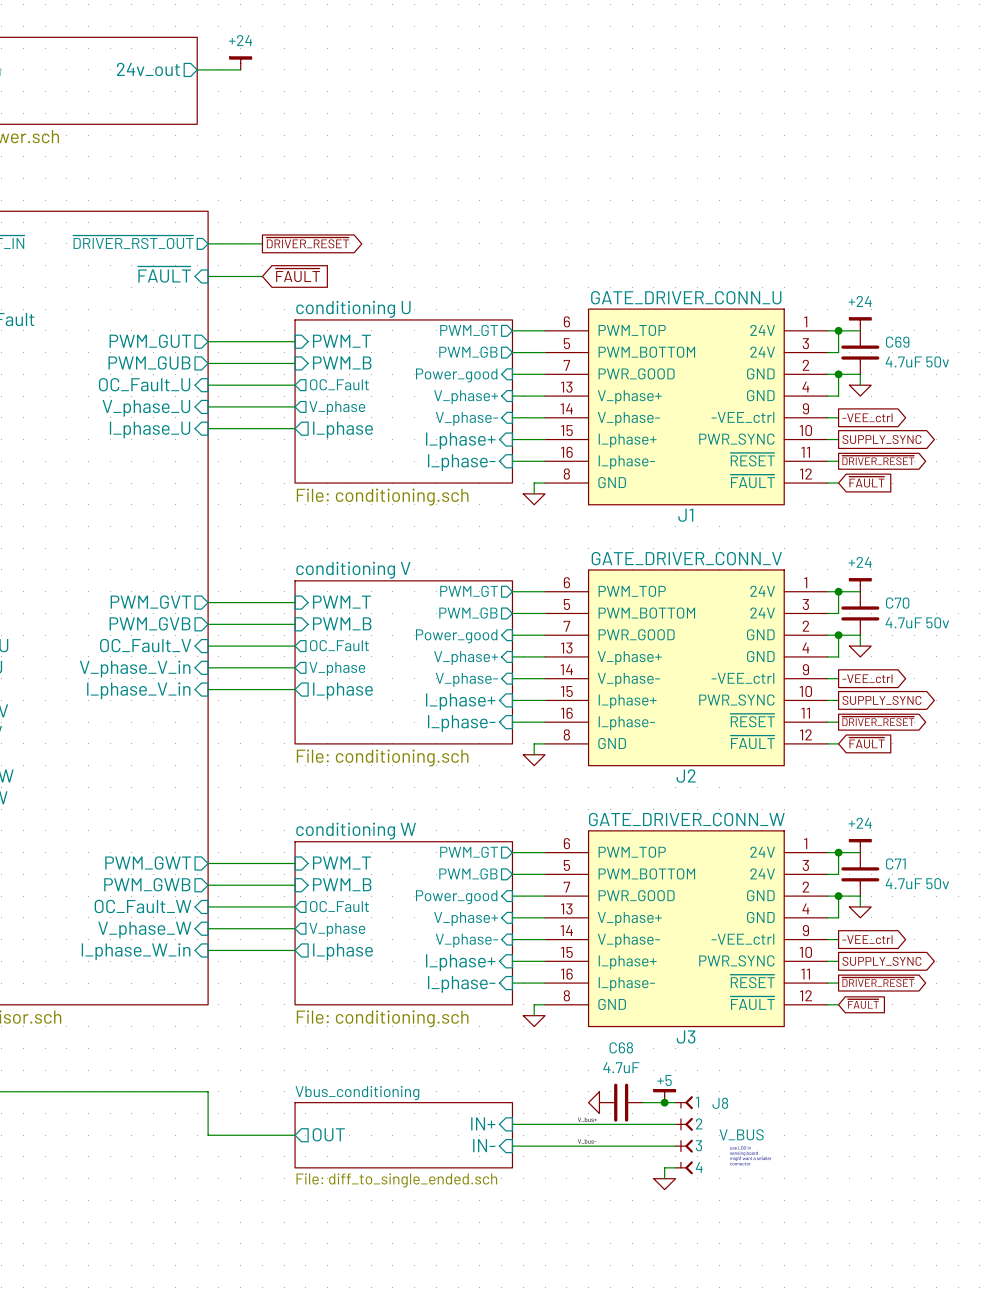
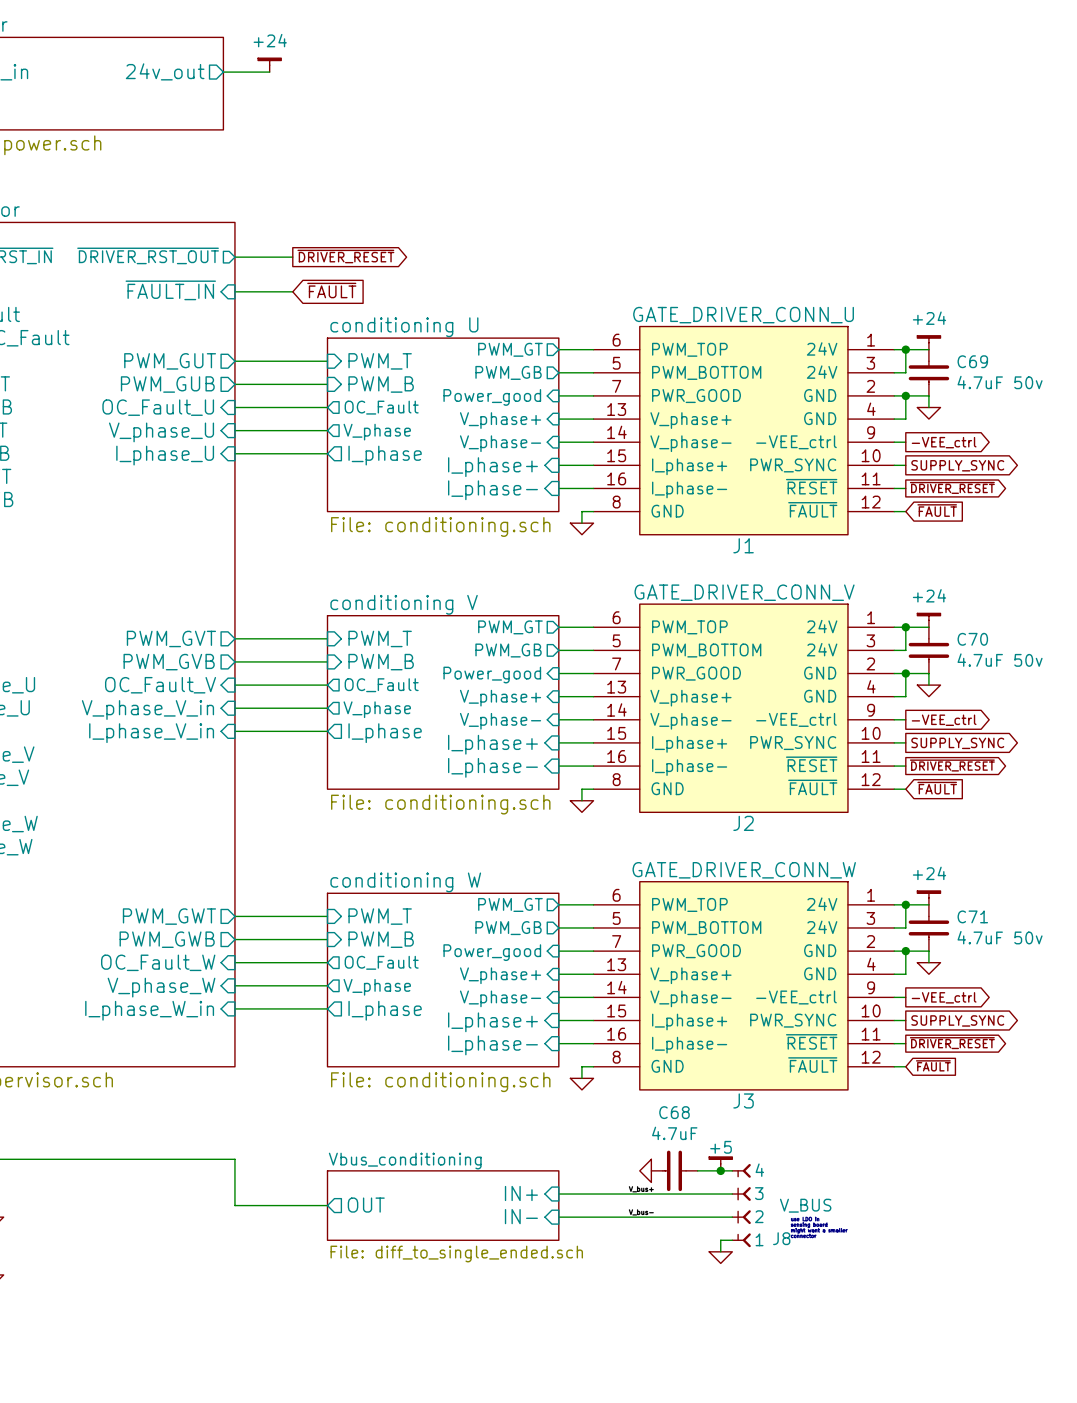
sheet pin: ~{FAULT} (164, 274) -> ~{FAULT_IN} (170, 290)
J8 flip: as is (686, 1135) -> up-down (744, 1205)

